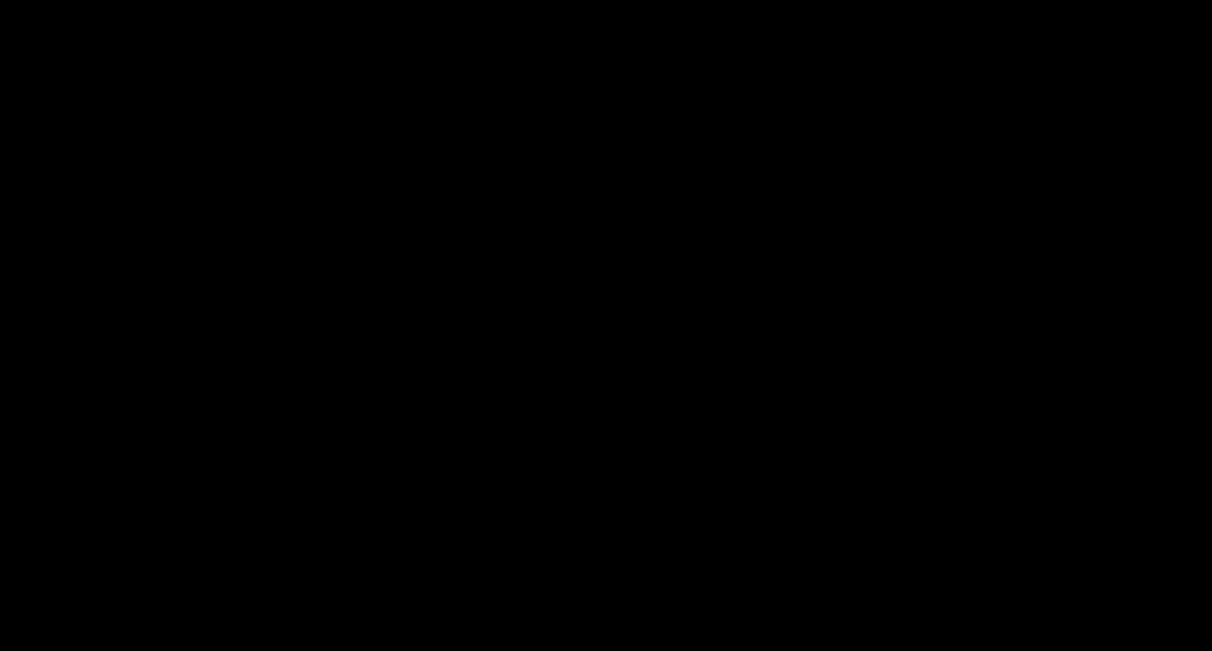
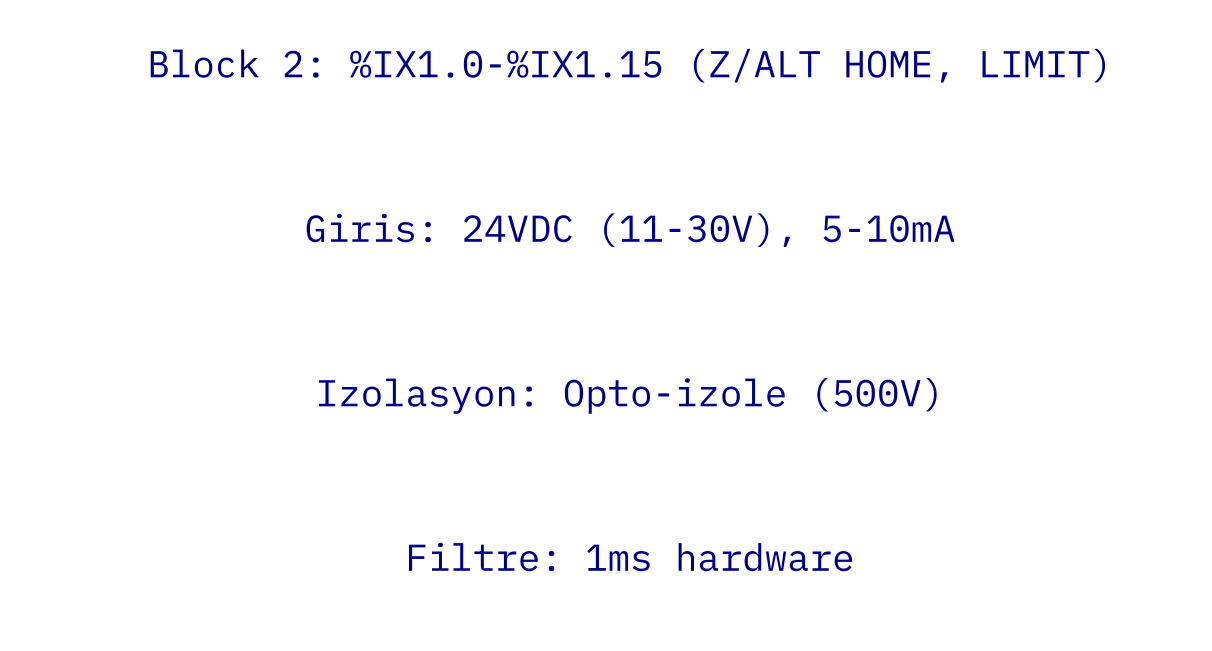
text: none -> Block 2: %IX1.0-%IX1.15 (Z/ALT HOME, LIMIT) (627, 65)
text: none -> Giris: 24VDC (11-30V), 5-10mA (630, 230)
text: none -> Izolasyon: Opto-izole (500V) (627, 395)
text: none -> Filtre: 1ms hardware (630, 557)

